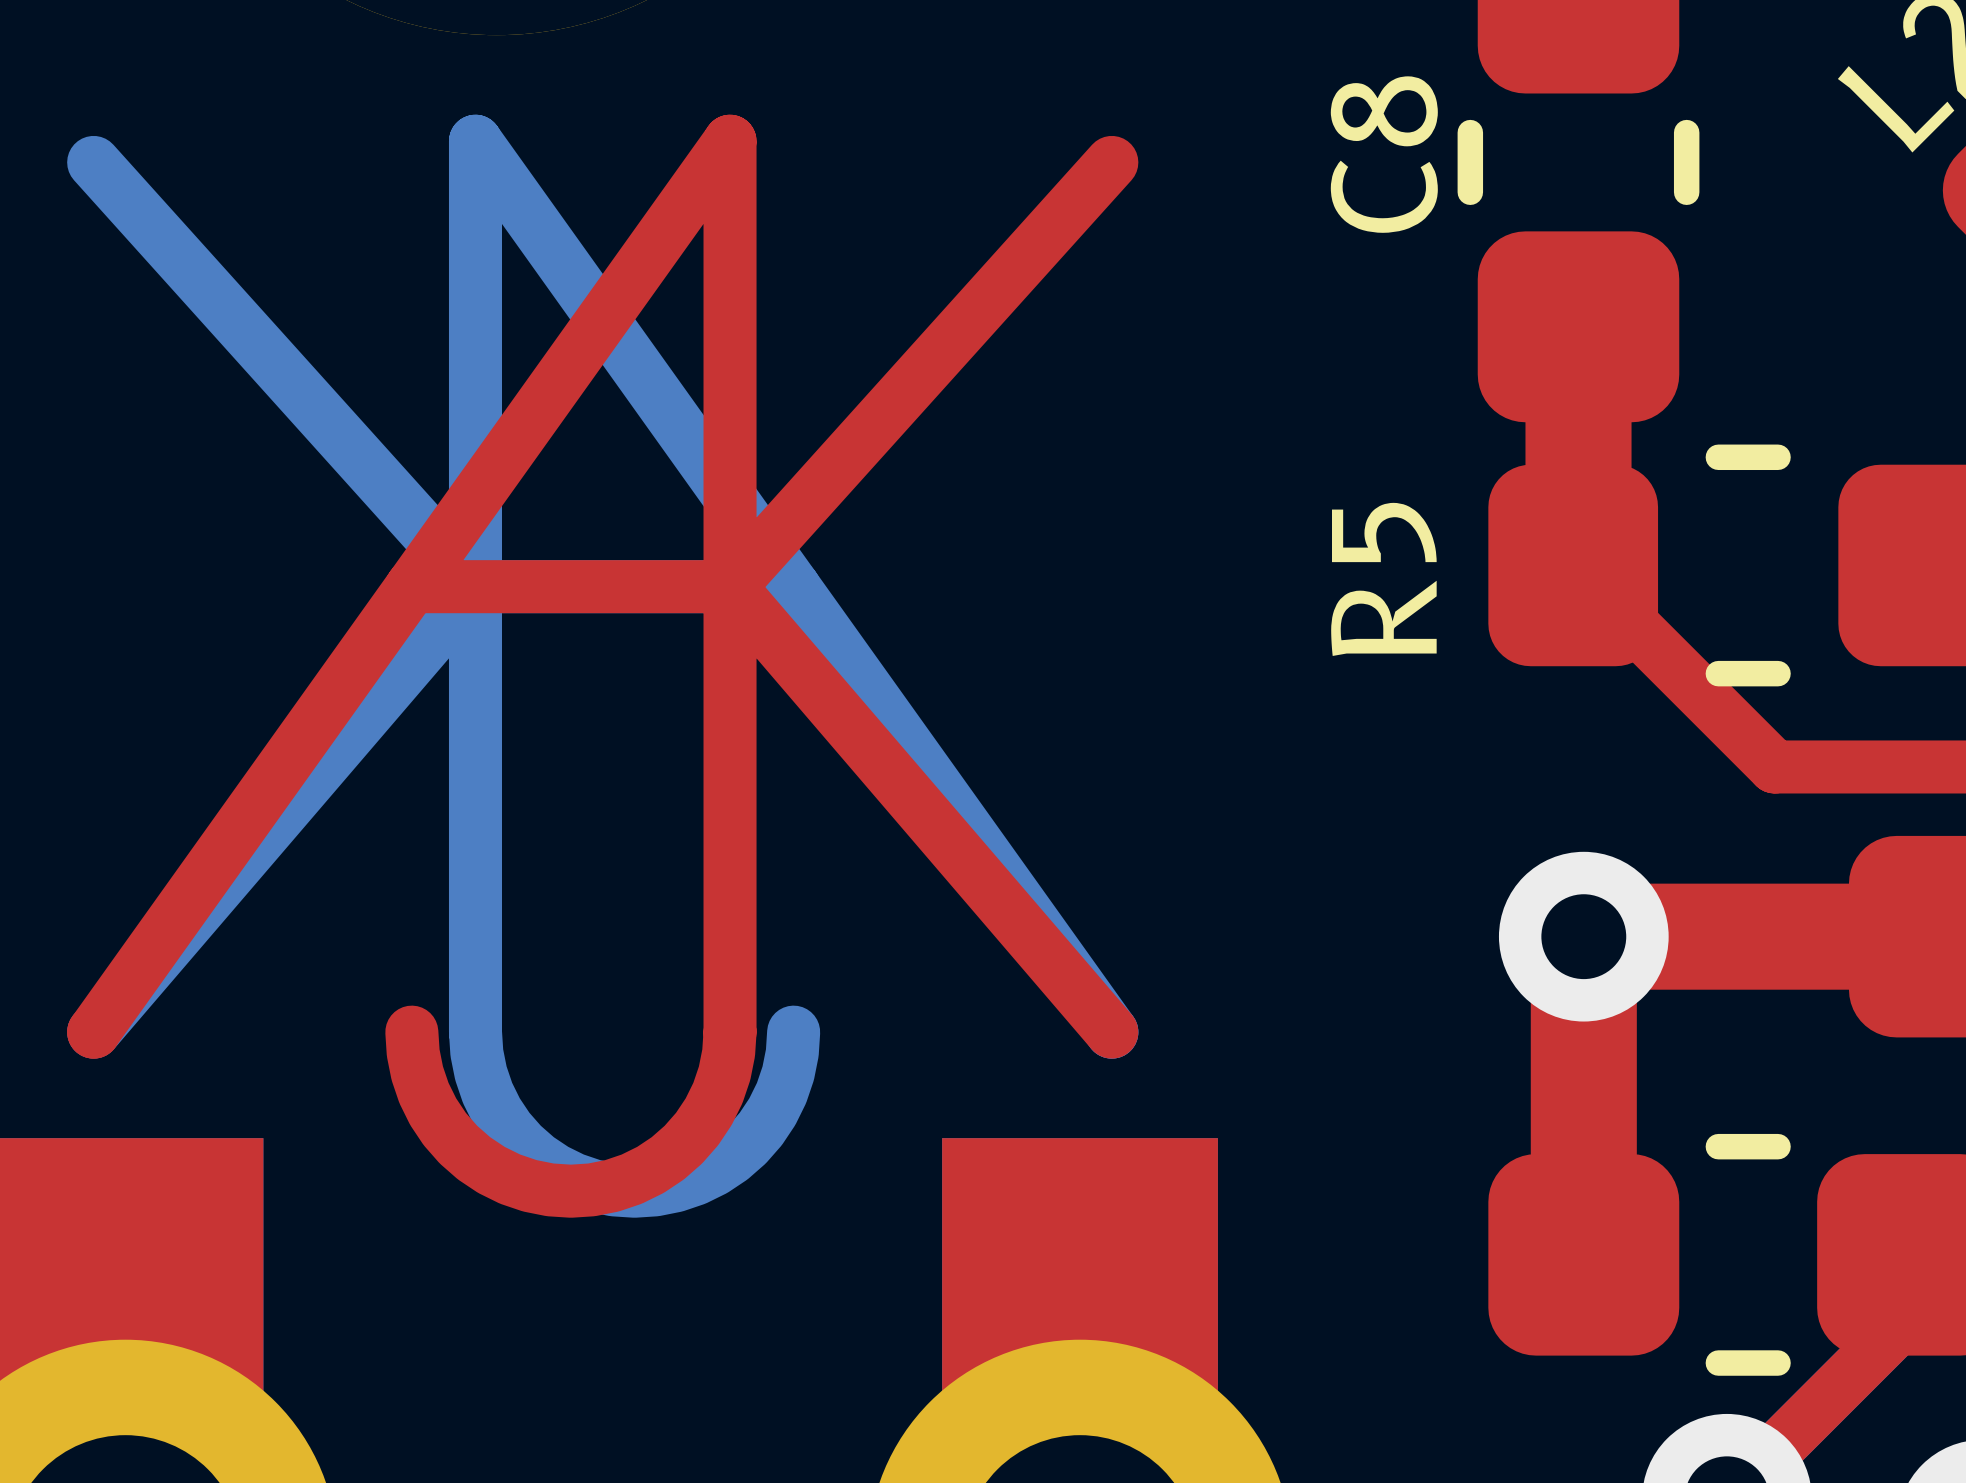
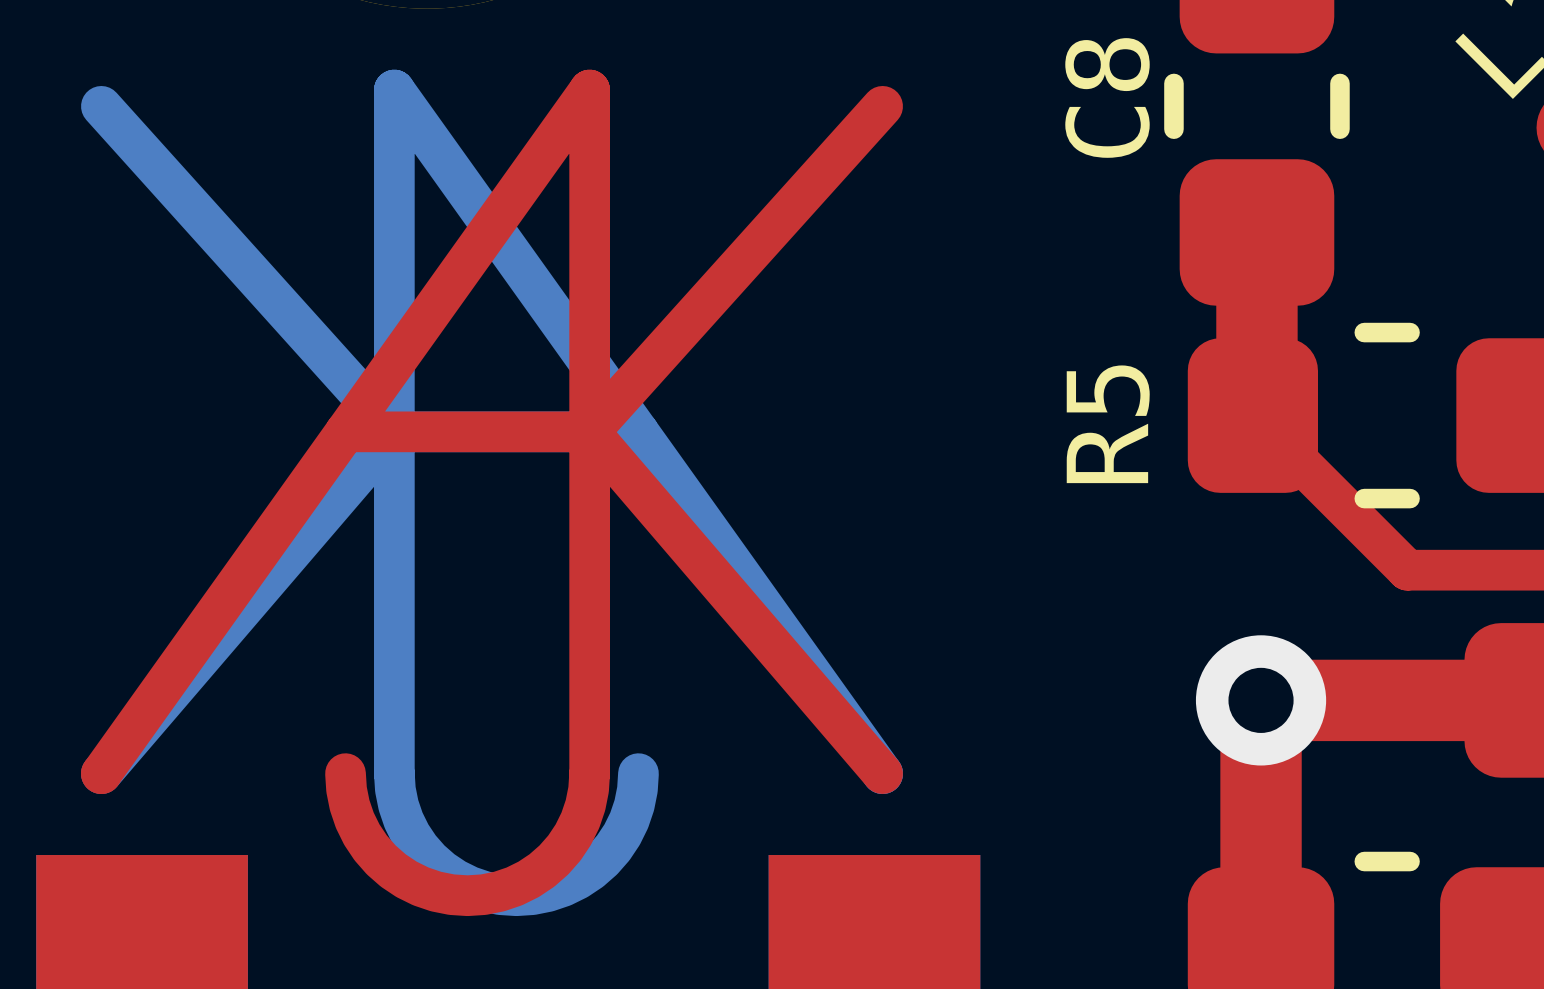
part position: (602, 666) -> (492, 492)
part position: (602, 666) -> (492, 492)

